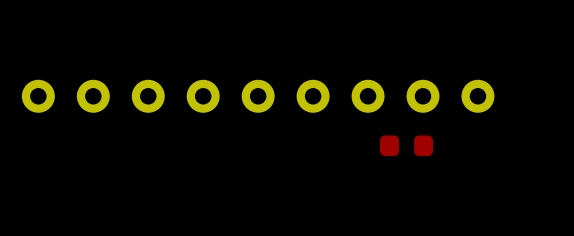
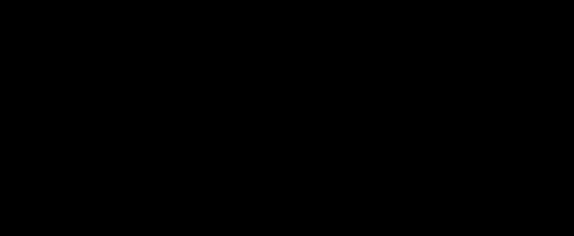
part: (258, 96) -> none
part: (406, 145) -> none

